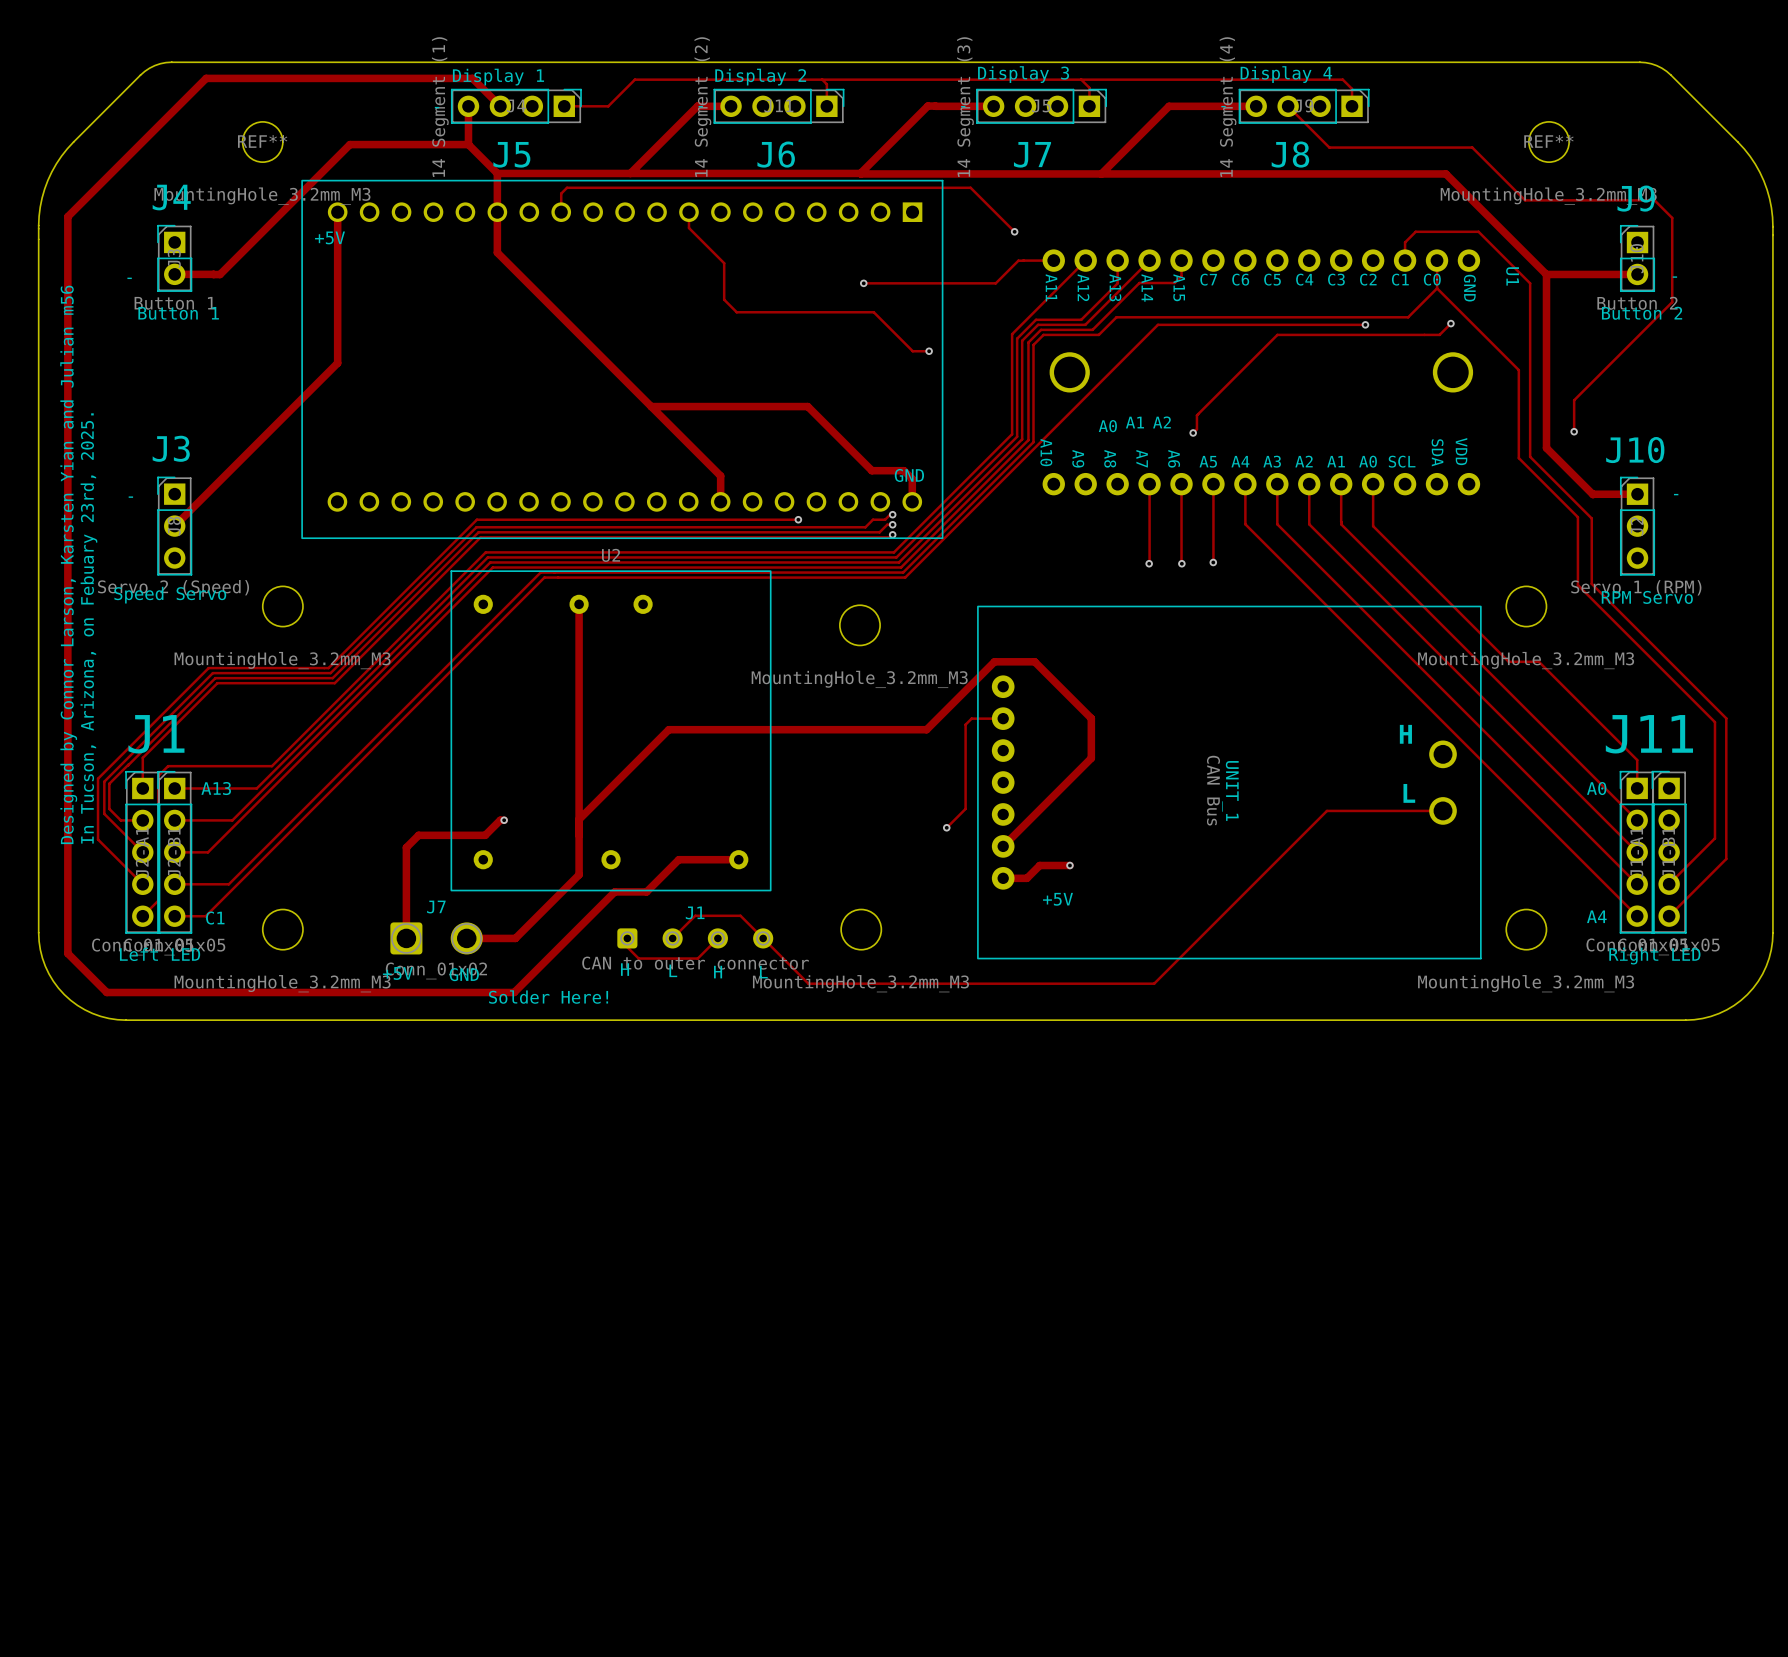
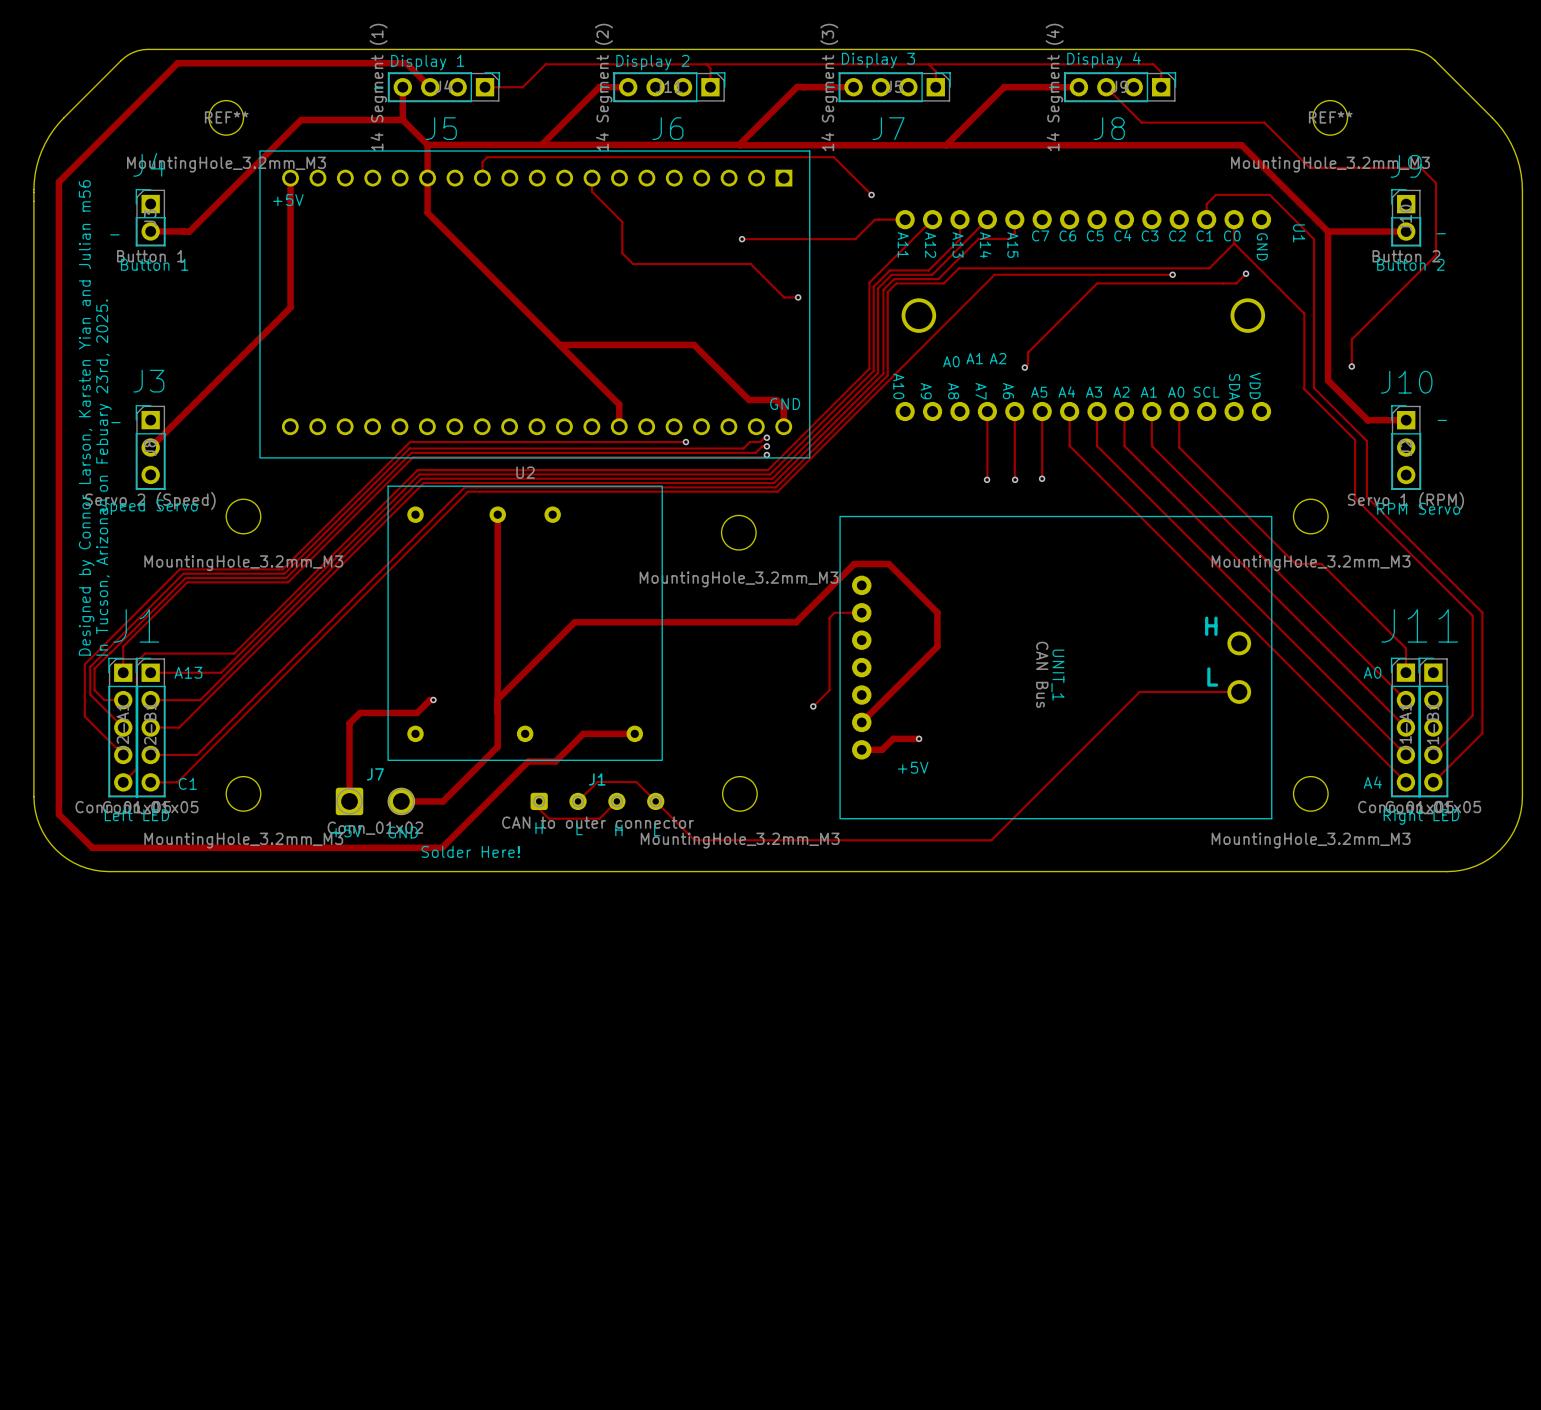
text position: Designed by Connor Larson, Karsten Yian and Julian m56 (68, 564) -> Designed by Connor Larson, Karsten Yian and Julian m56 (86, 417)
text position: In Tucson, Arizona, on Febuary 23rd, 2025. (88, 628) -> In Tucson, Arizona, on Febuary 23rd, 2025. (103, 477)

